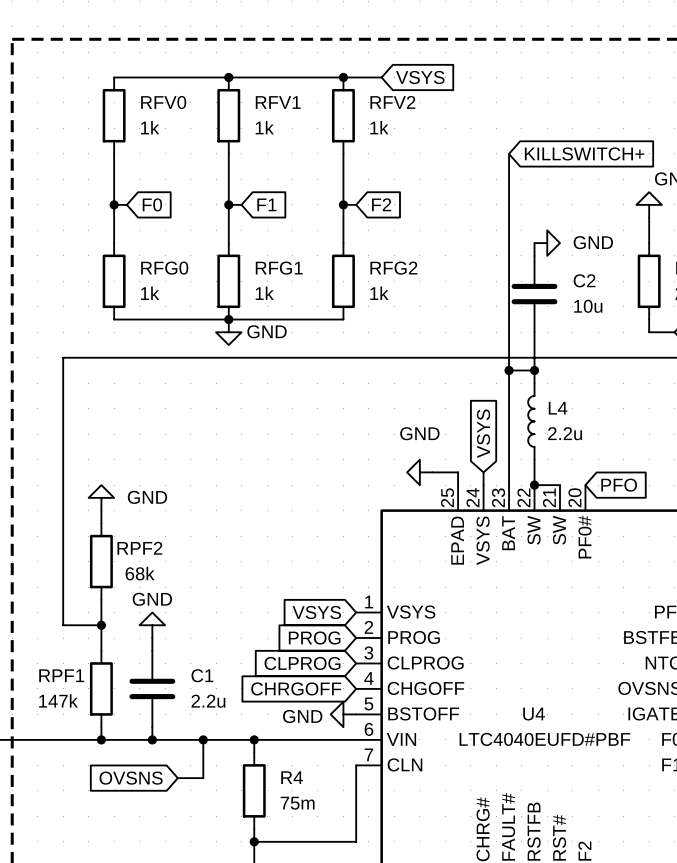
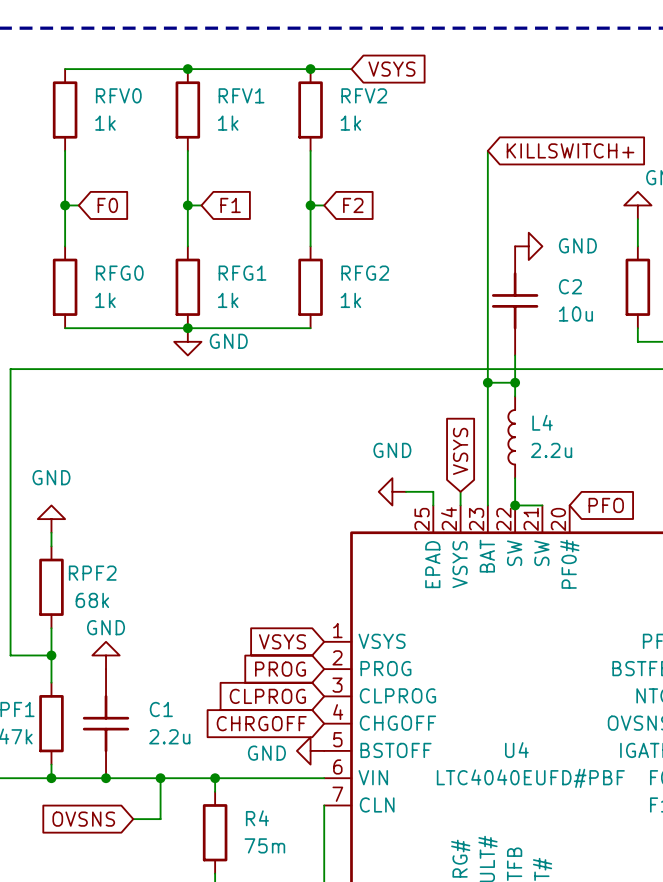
C2 symbol: [511, 255, 558, 333] -> [491, 246, 539, 356]
power symbol text position: GND (147, 497) -> GND (51, 477)
C1 symbol: [129, 650, 176, 728] -> [82, 669, 130, 779]

